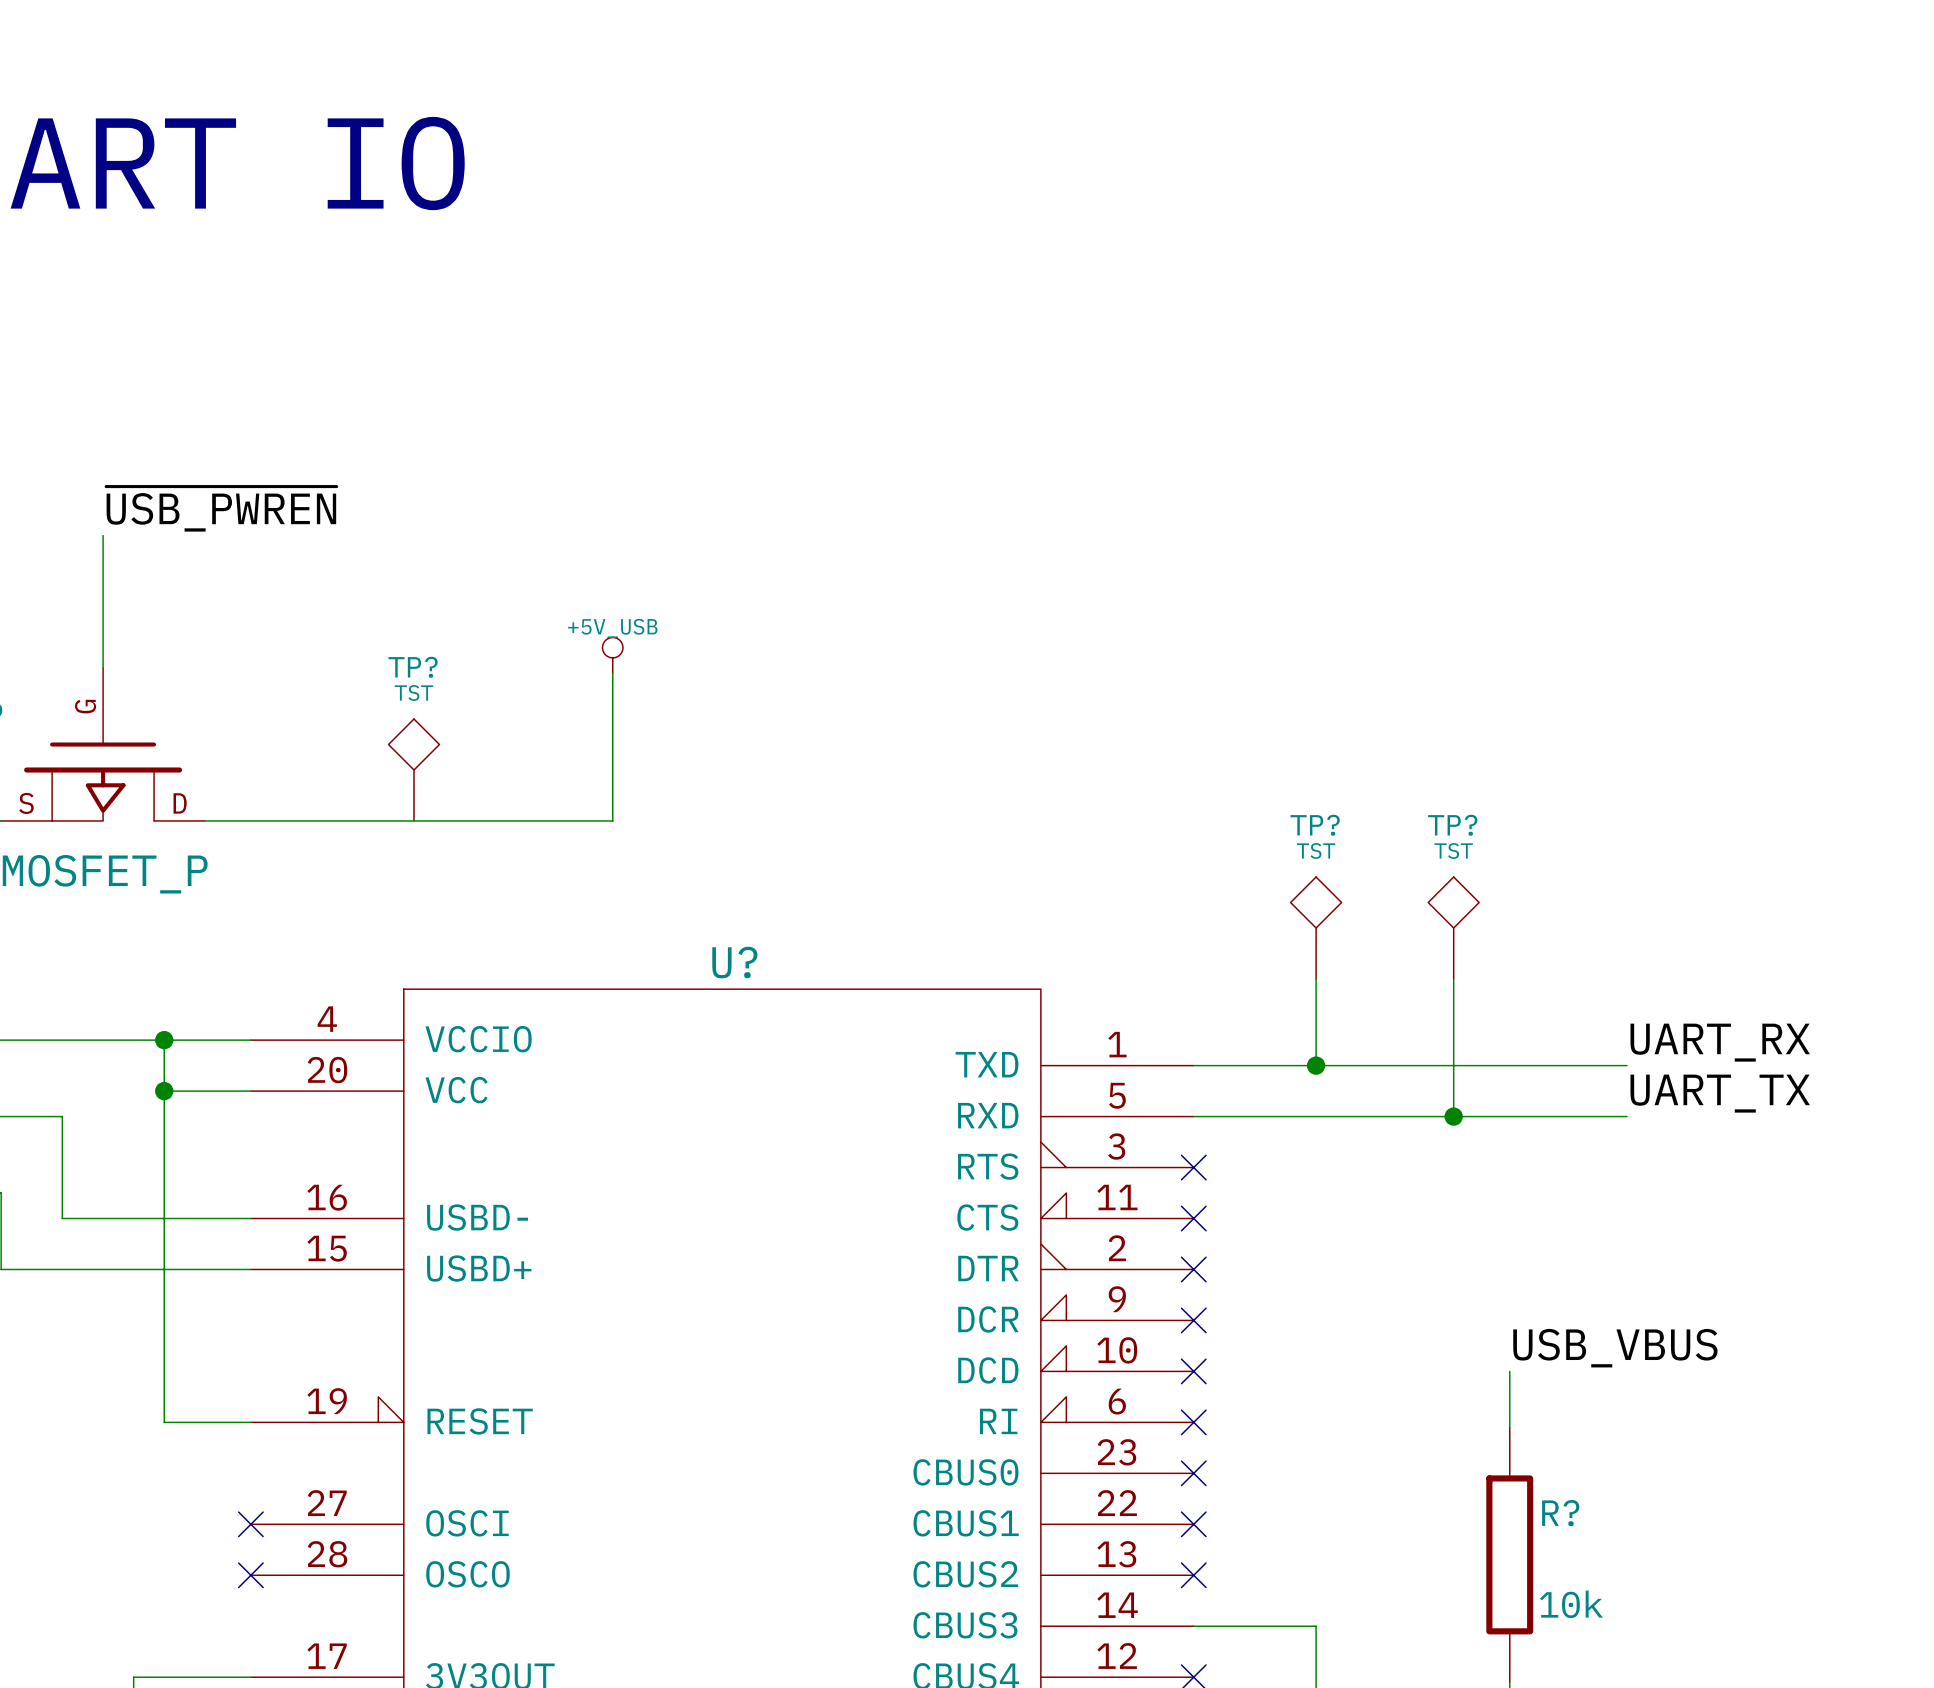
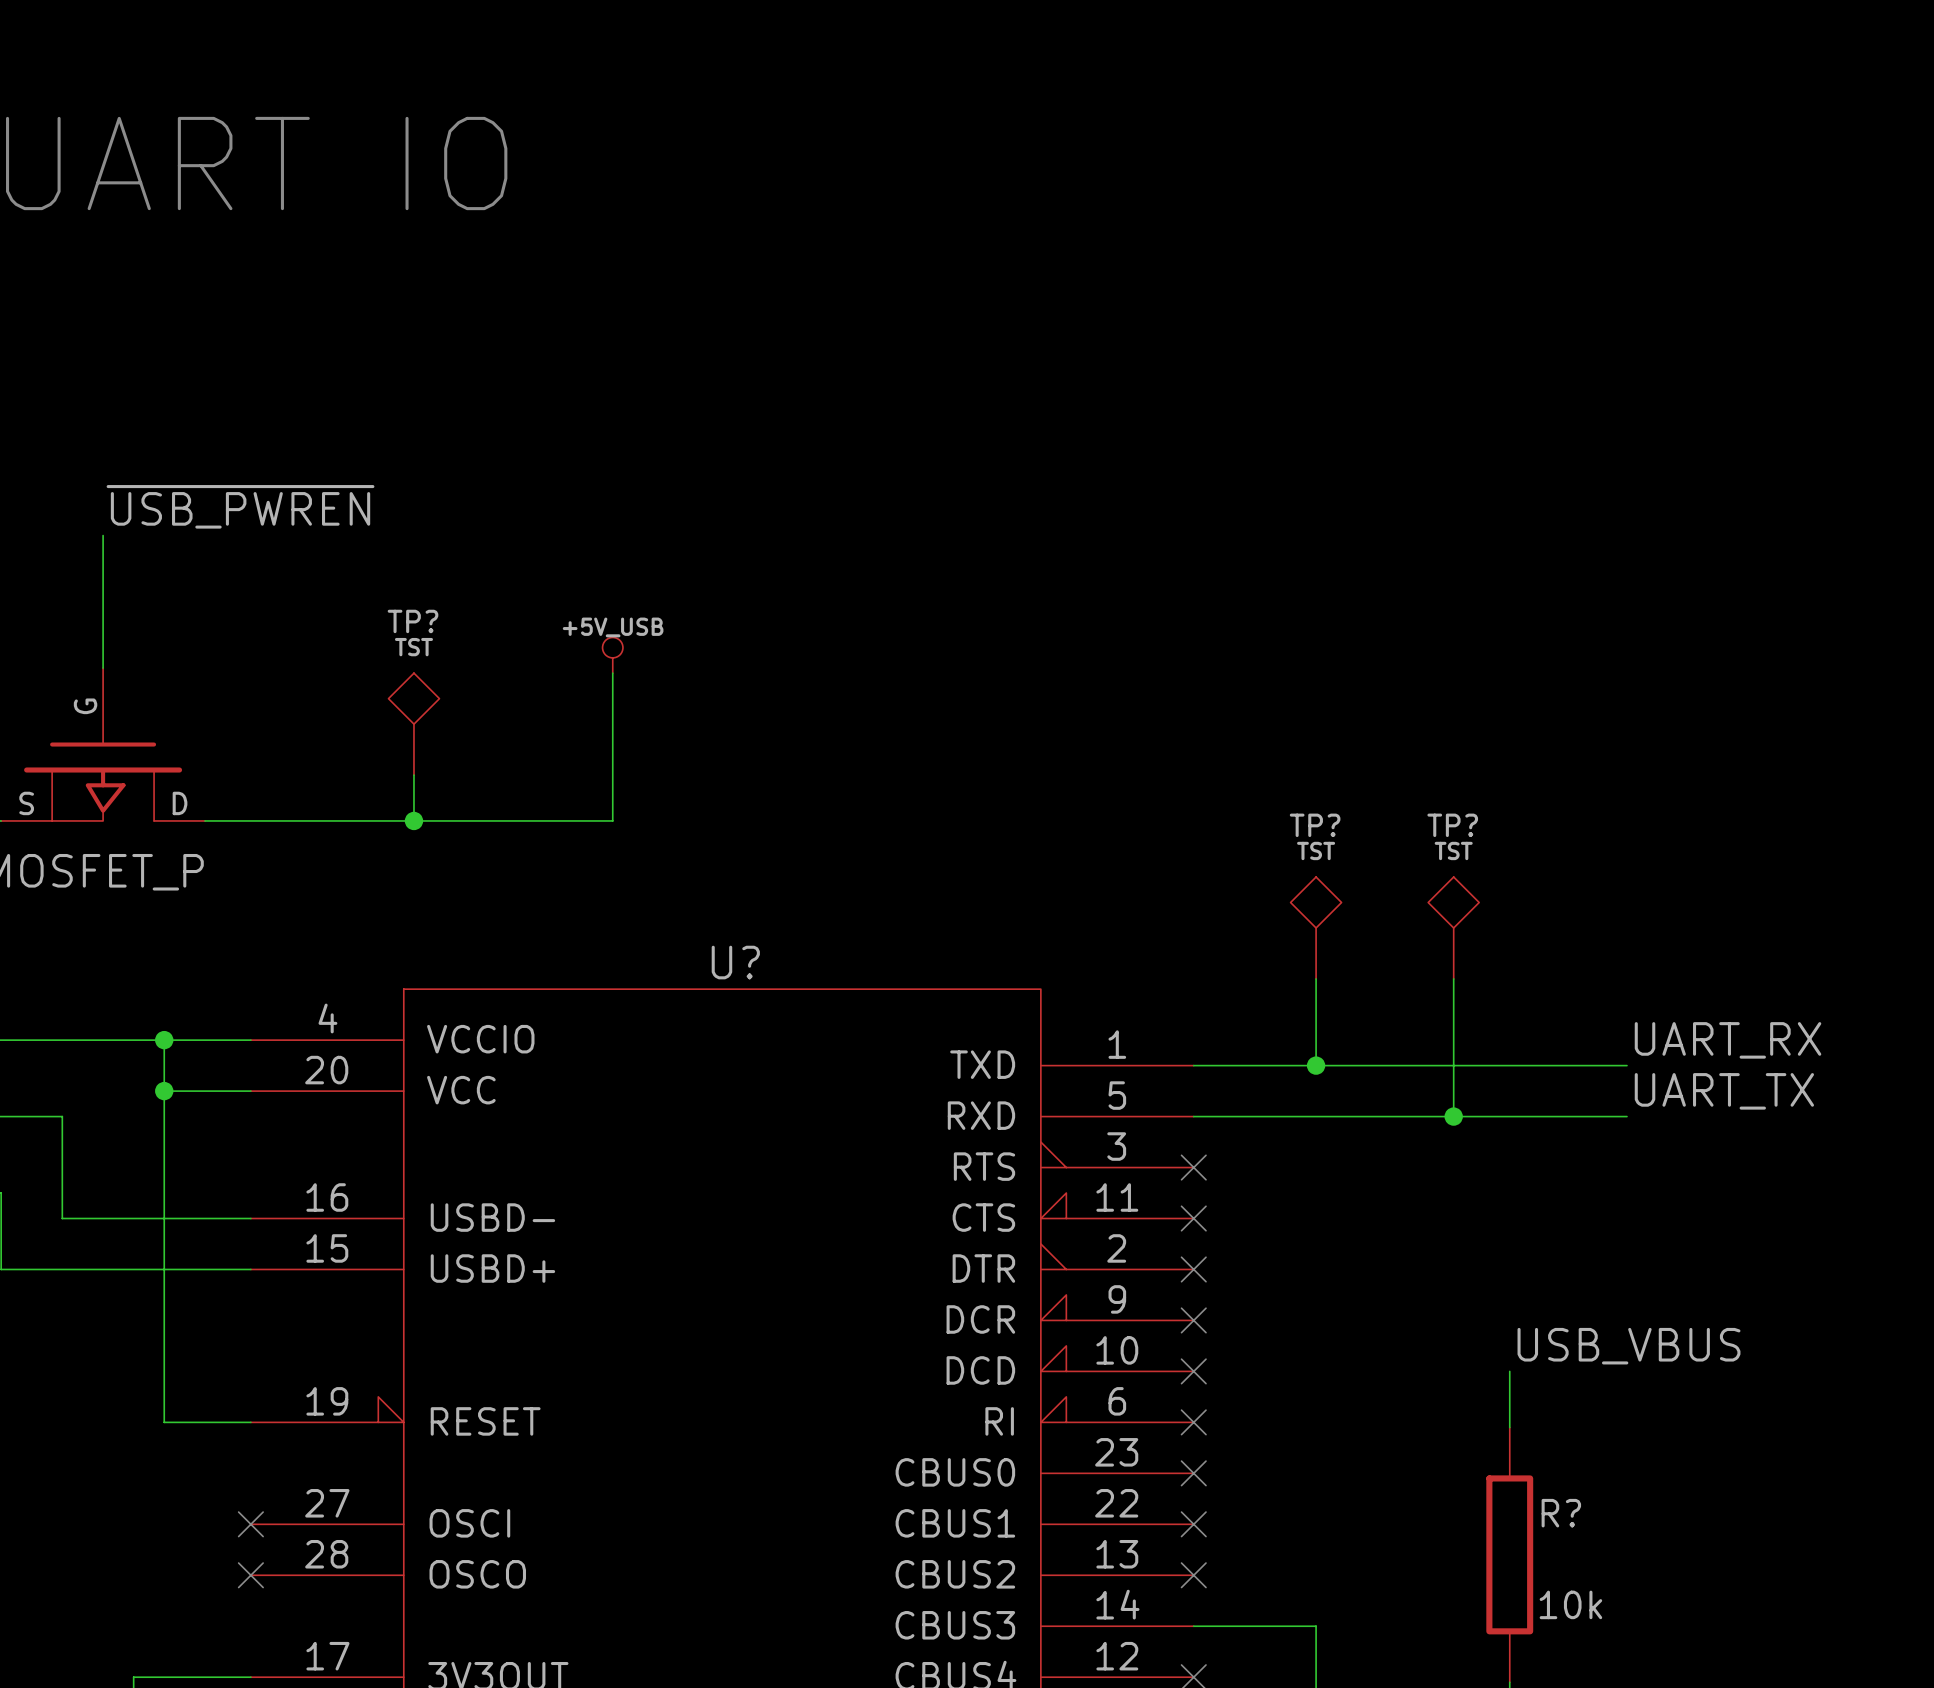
TP? position: (413, 770) -> (413, 724)
junction: none -> (413, 820)

